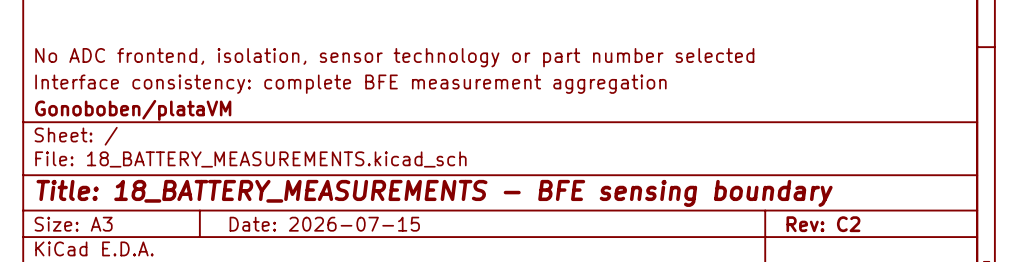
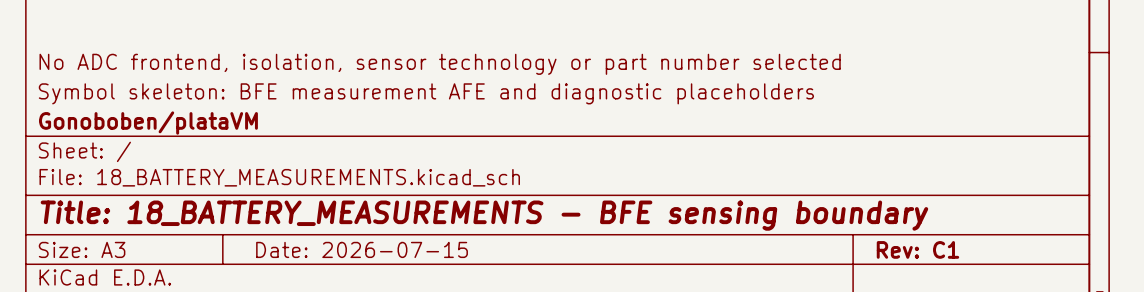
title block: Interface consistency: complete BFE measurement aggregation (350, 84) -> Symbol skeleton: BFE measurement AFE and diagnostic placeholders (426, 93)
title block: Rev: C2 (823, 224) -> Rev: C1 (917, 249)

